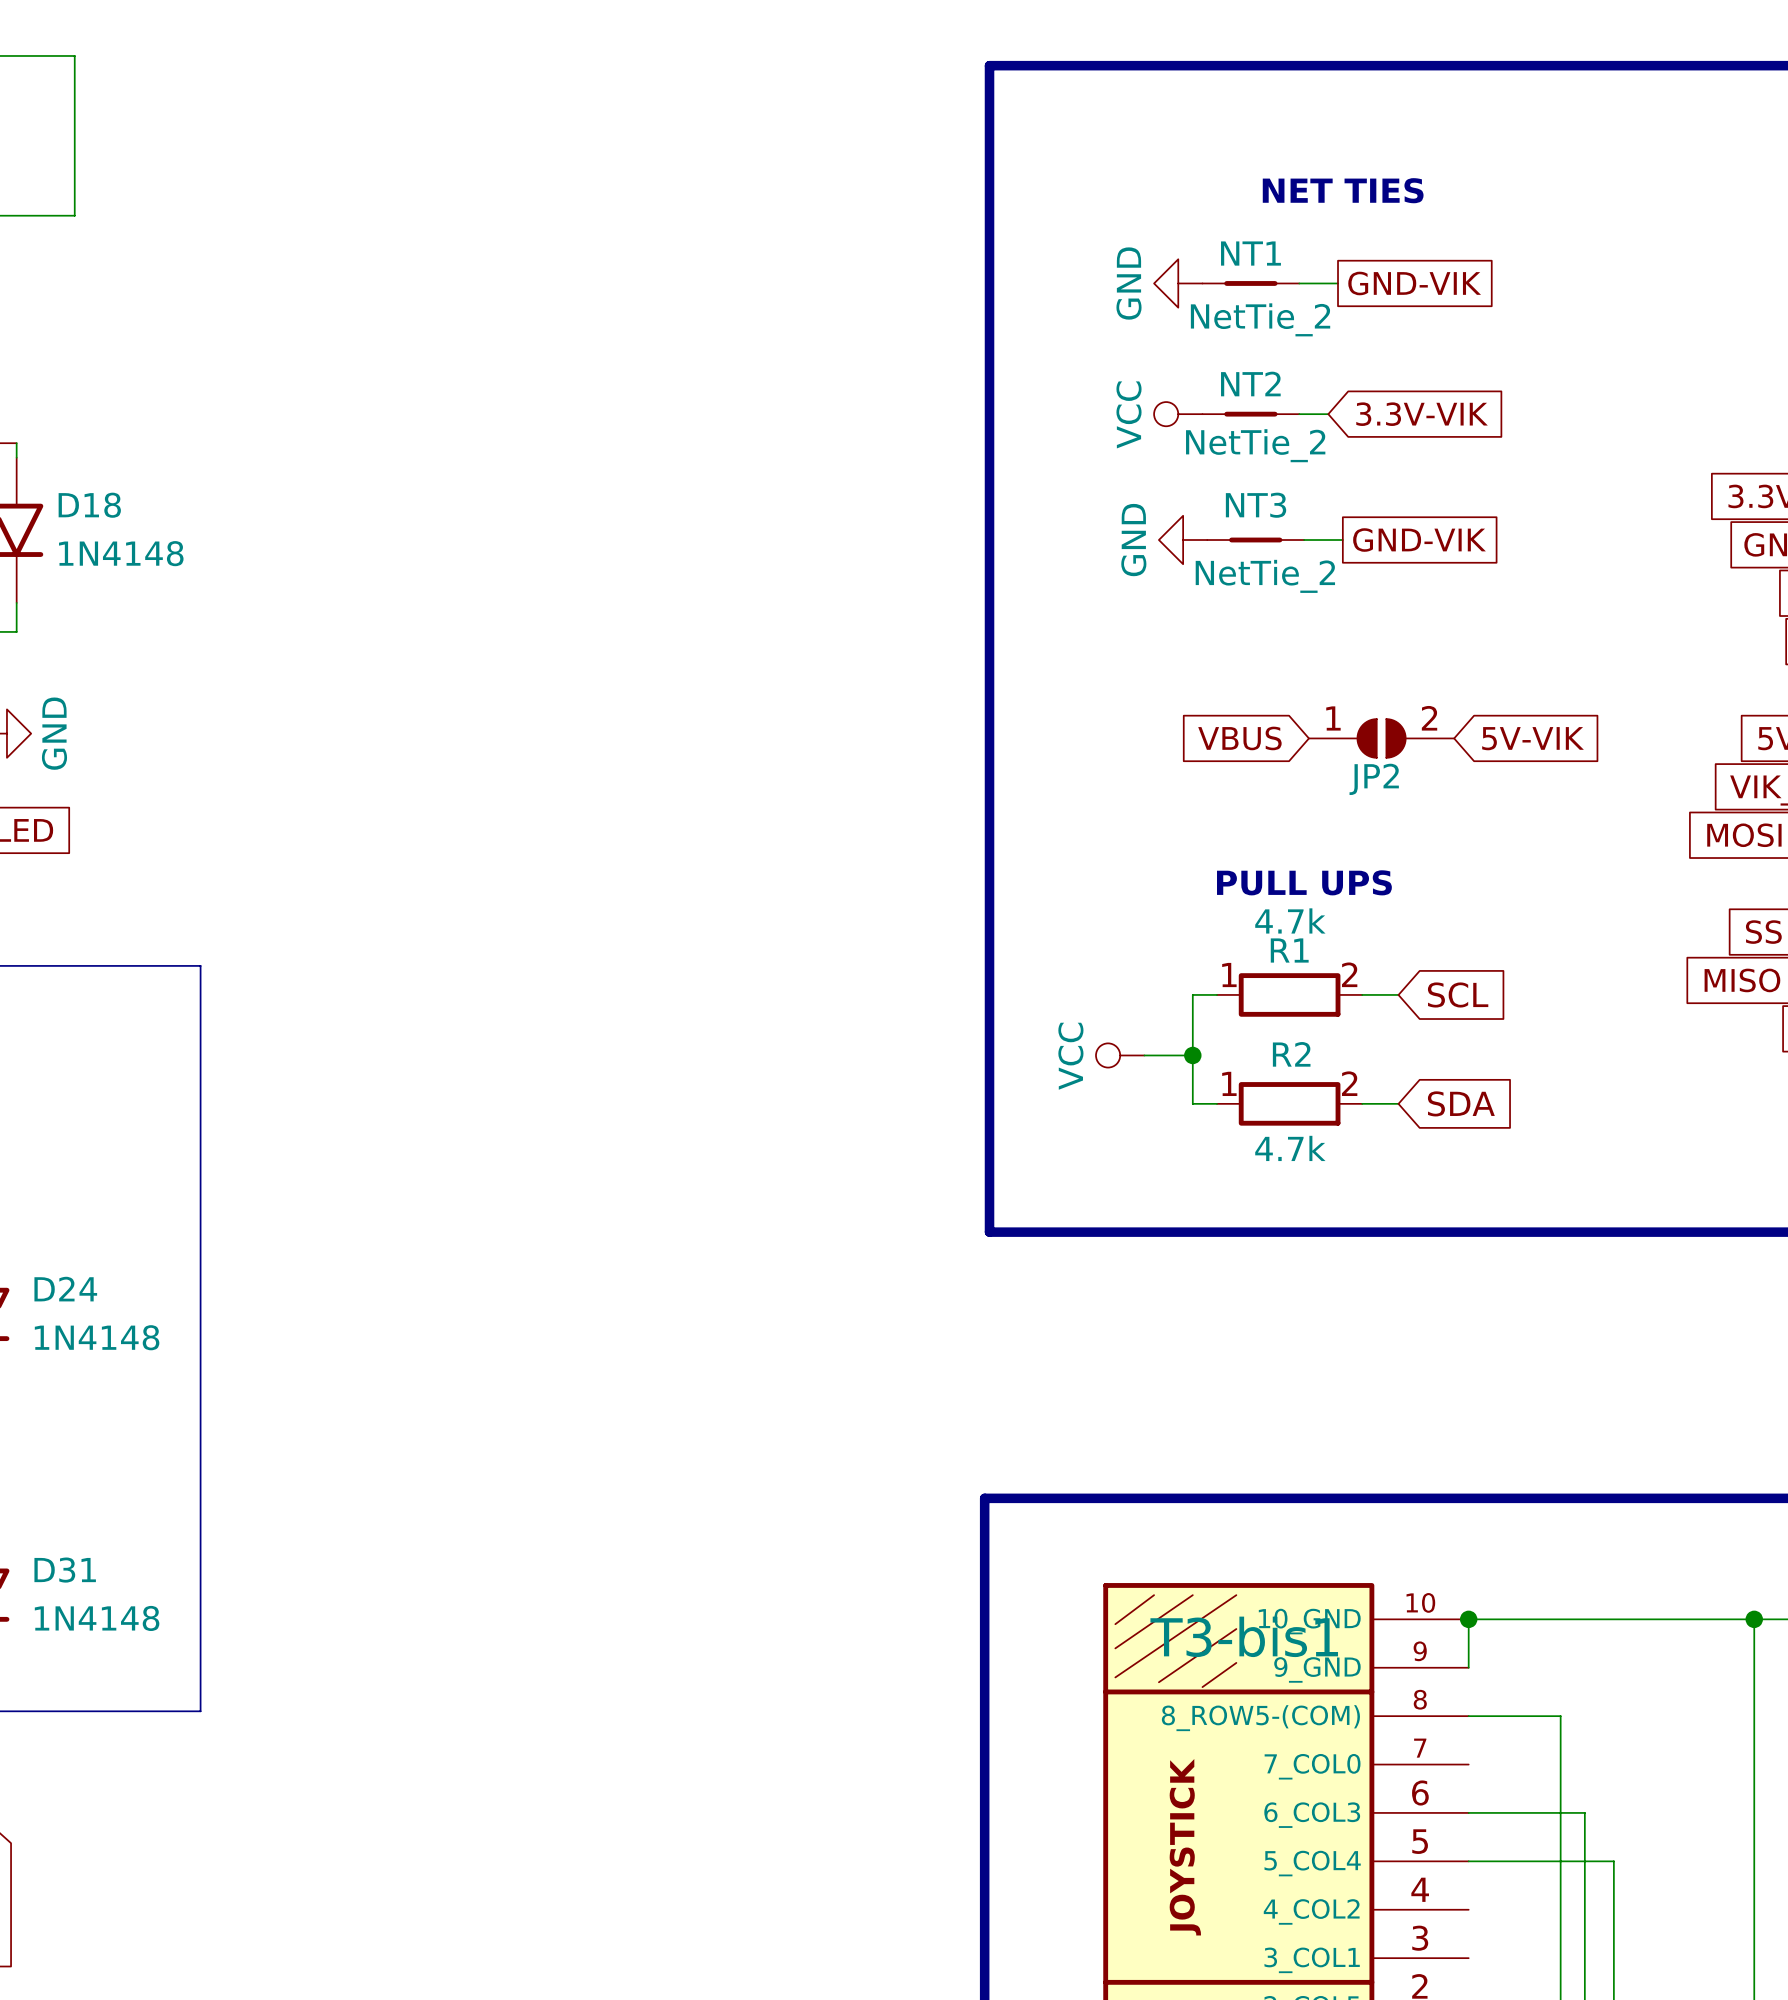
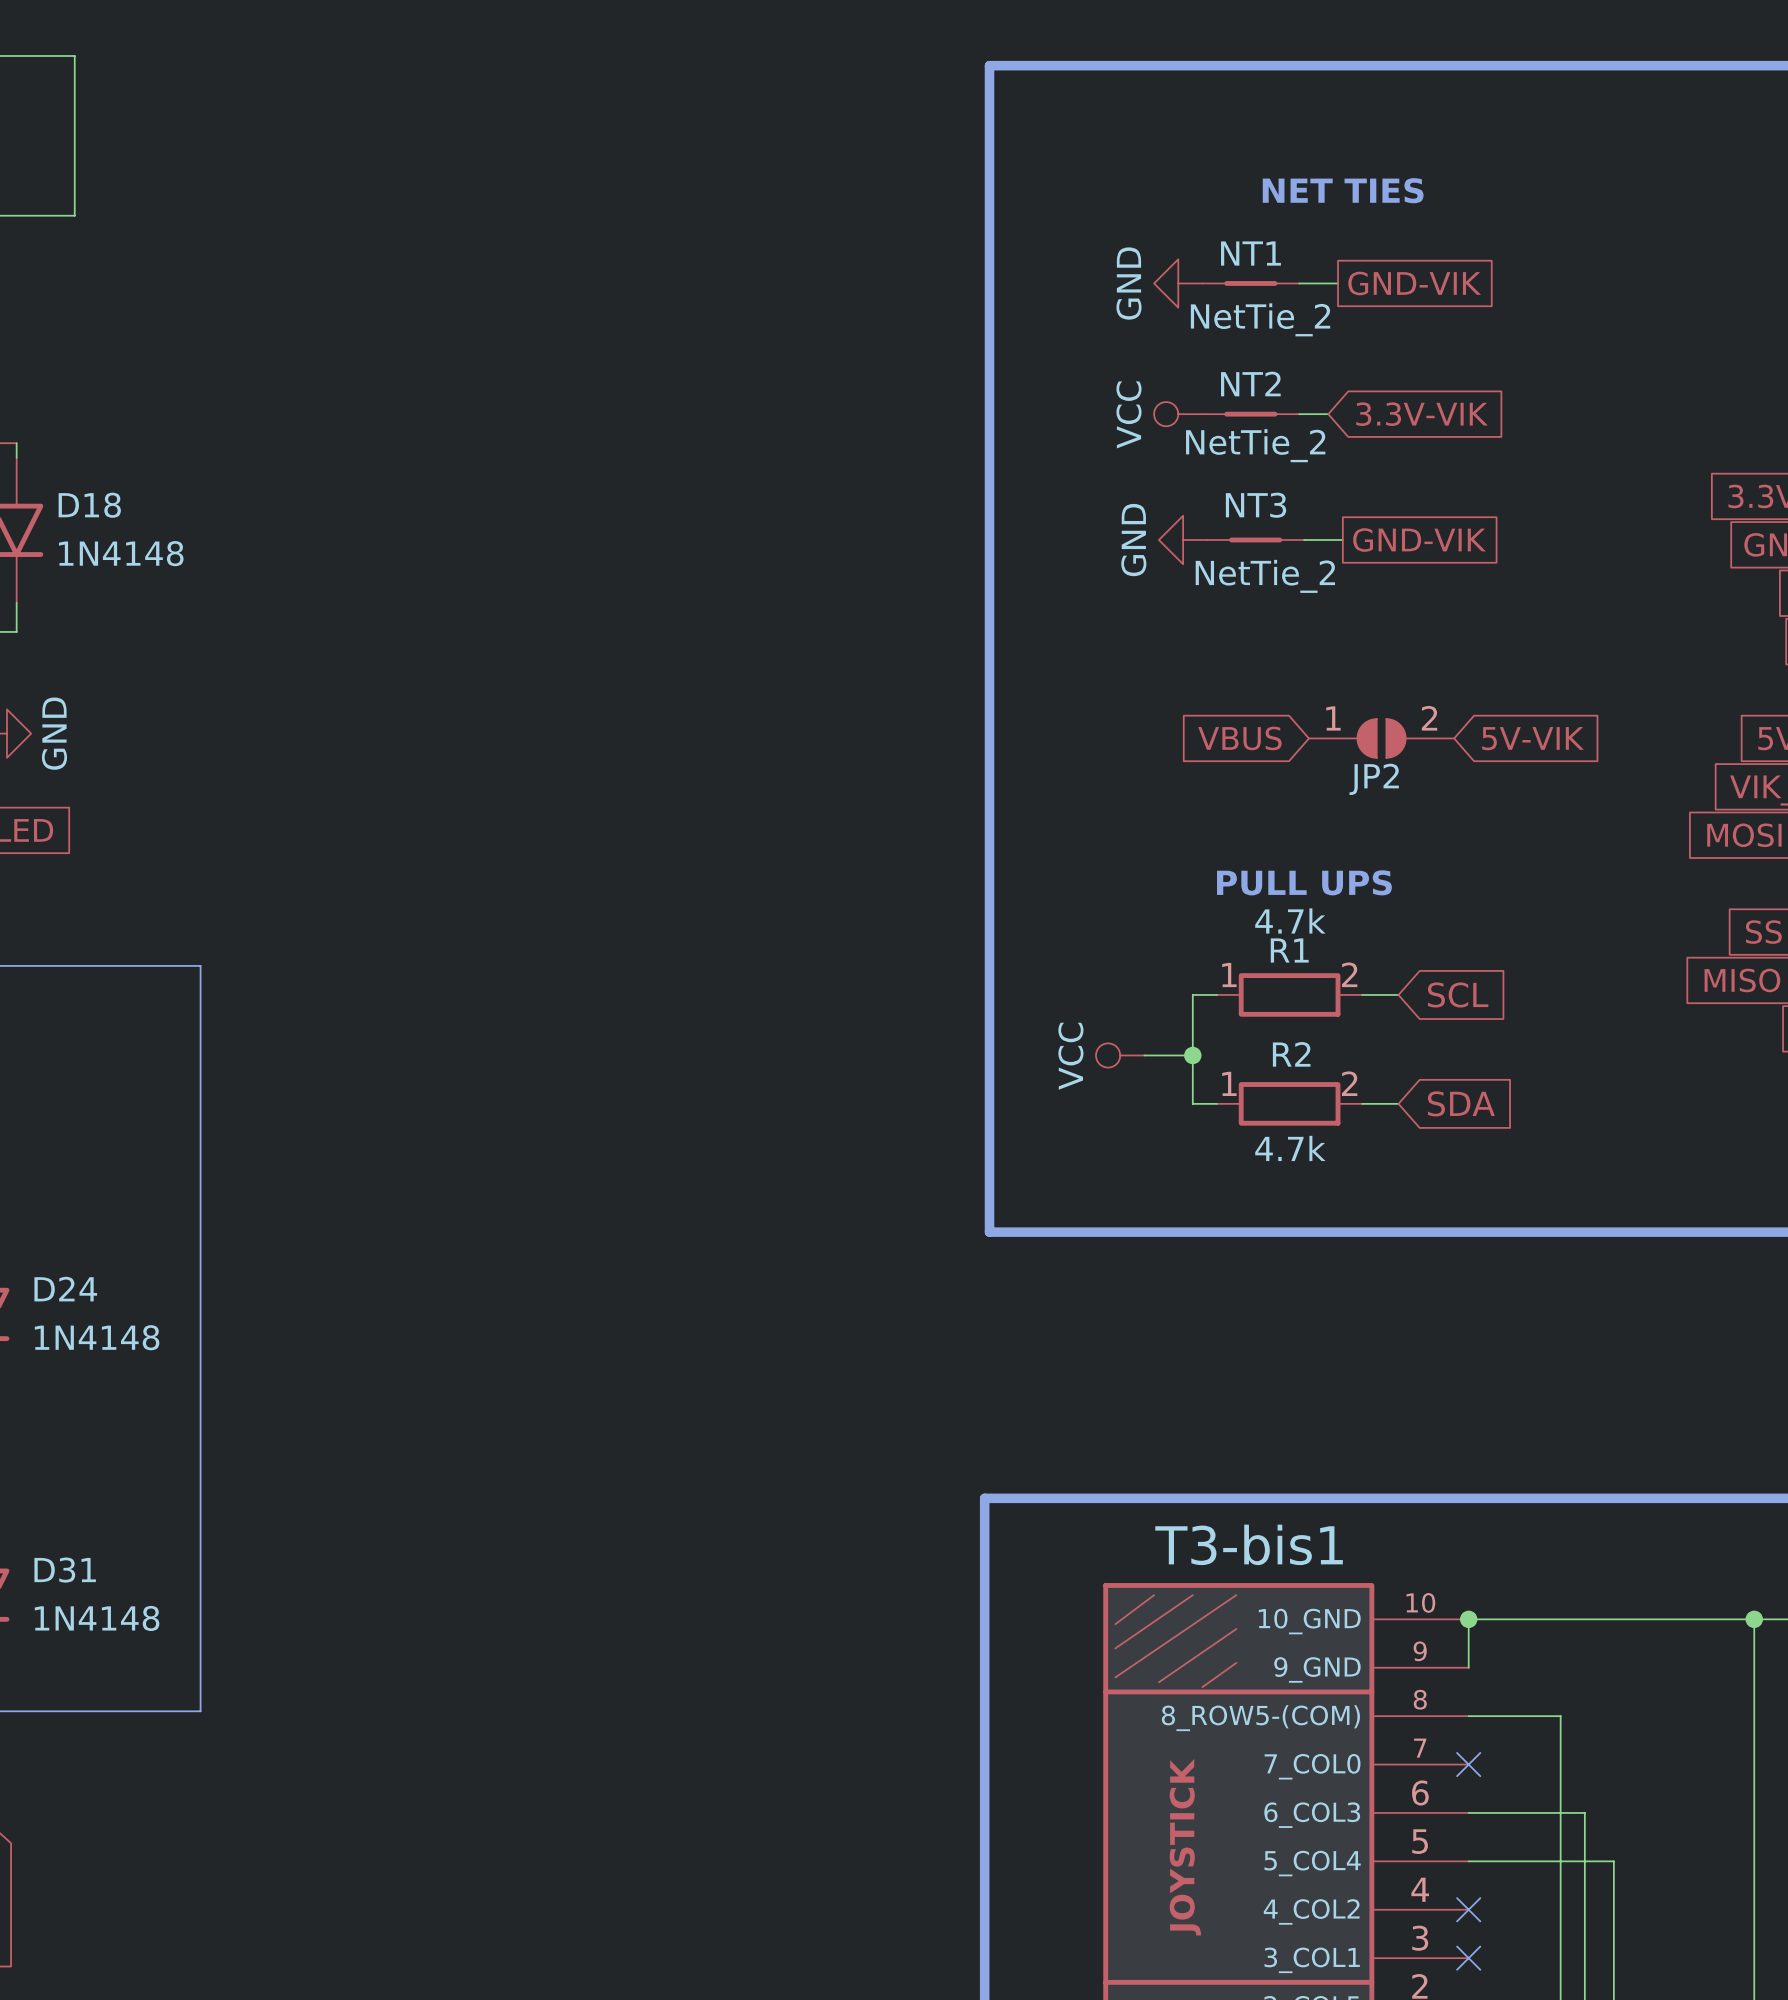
T3-bis1 name position: T3-bis1 (1244, 1636) -> T3-bis1 (1249, 1544)
no-connect mark: none -> (1468, 1764)
no-connect mark: none -> (1468, 1909)
no-connect mark: none -> (1468, 1958)

